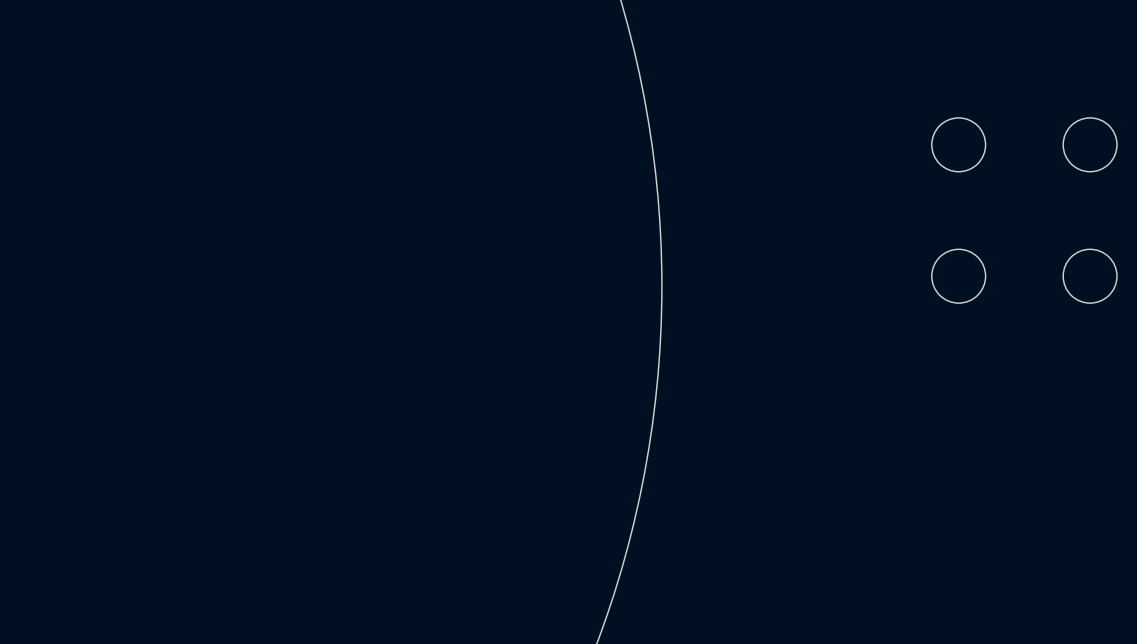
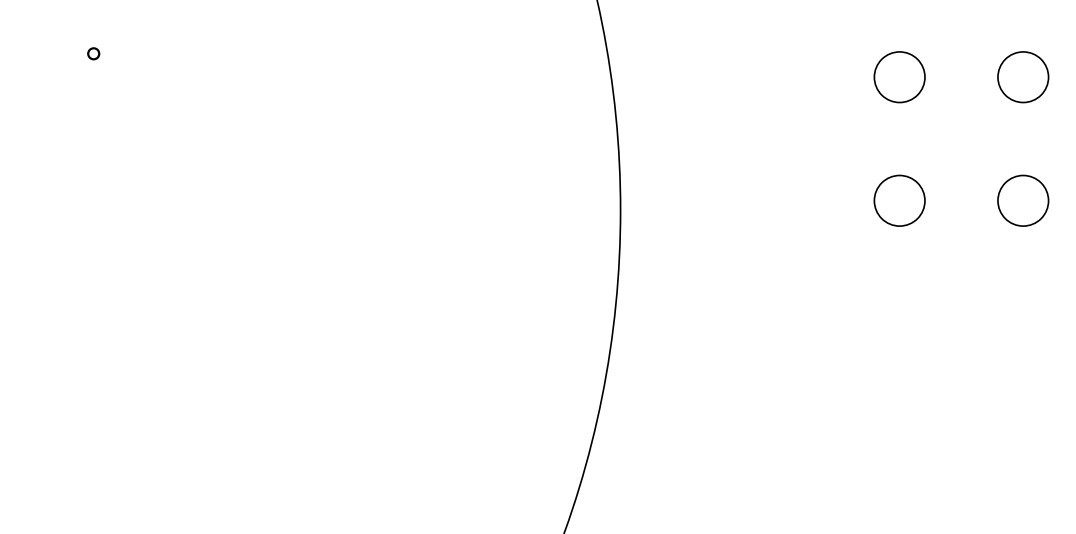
part: none -> (93, 53)

